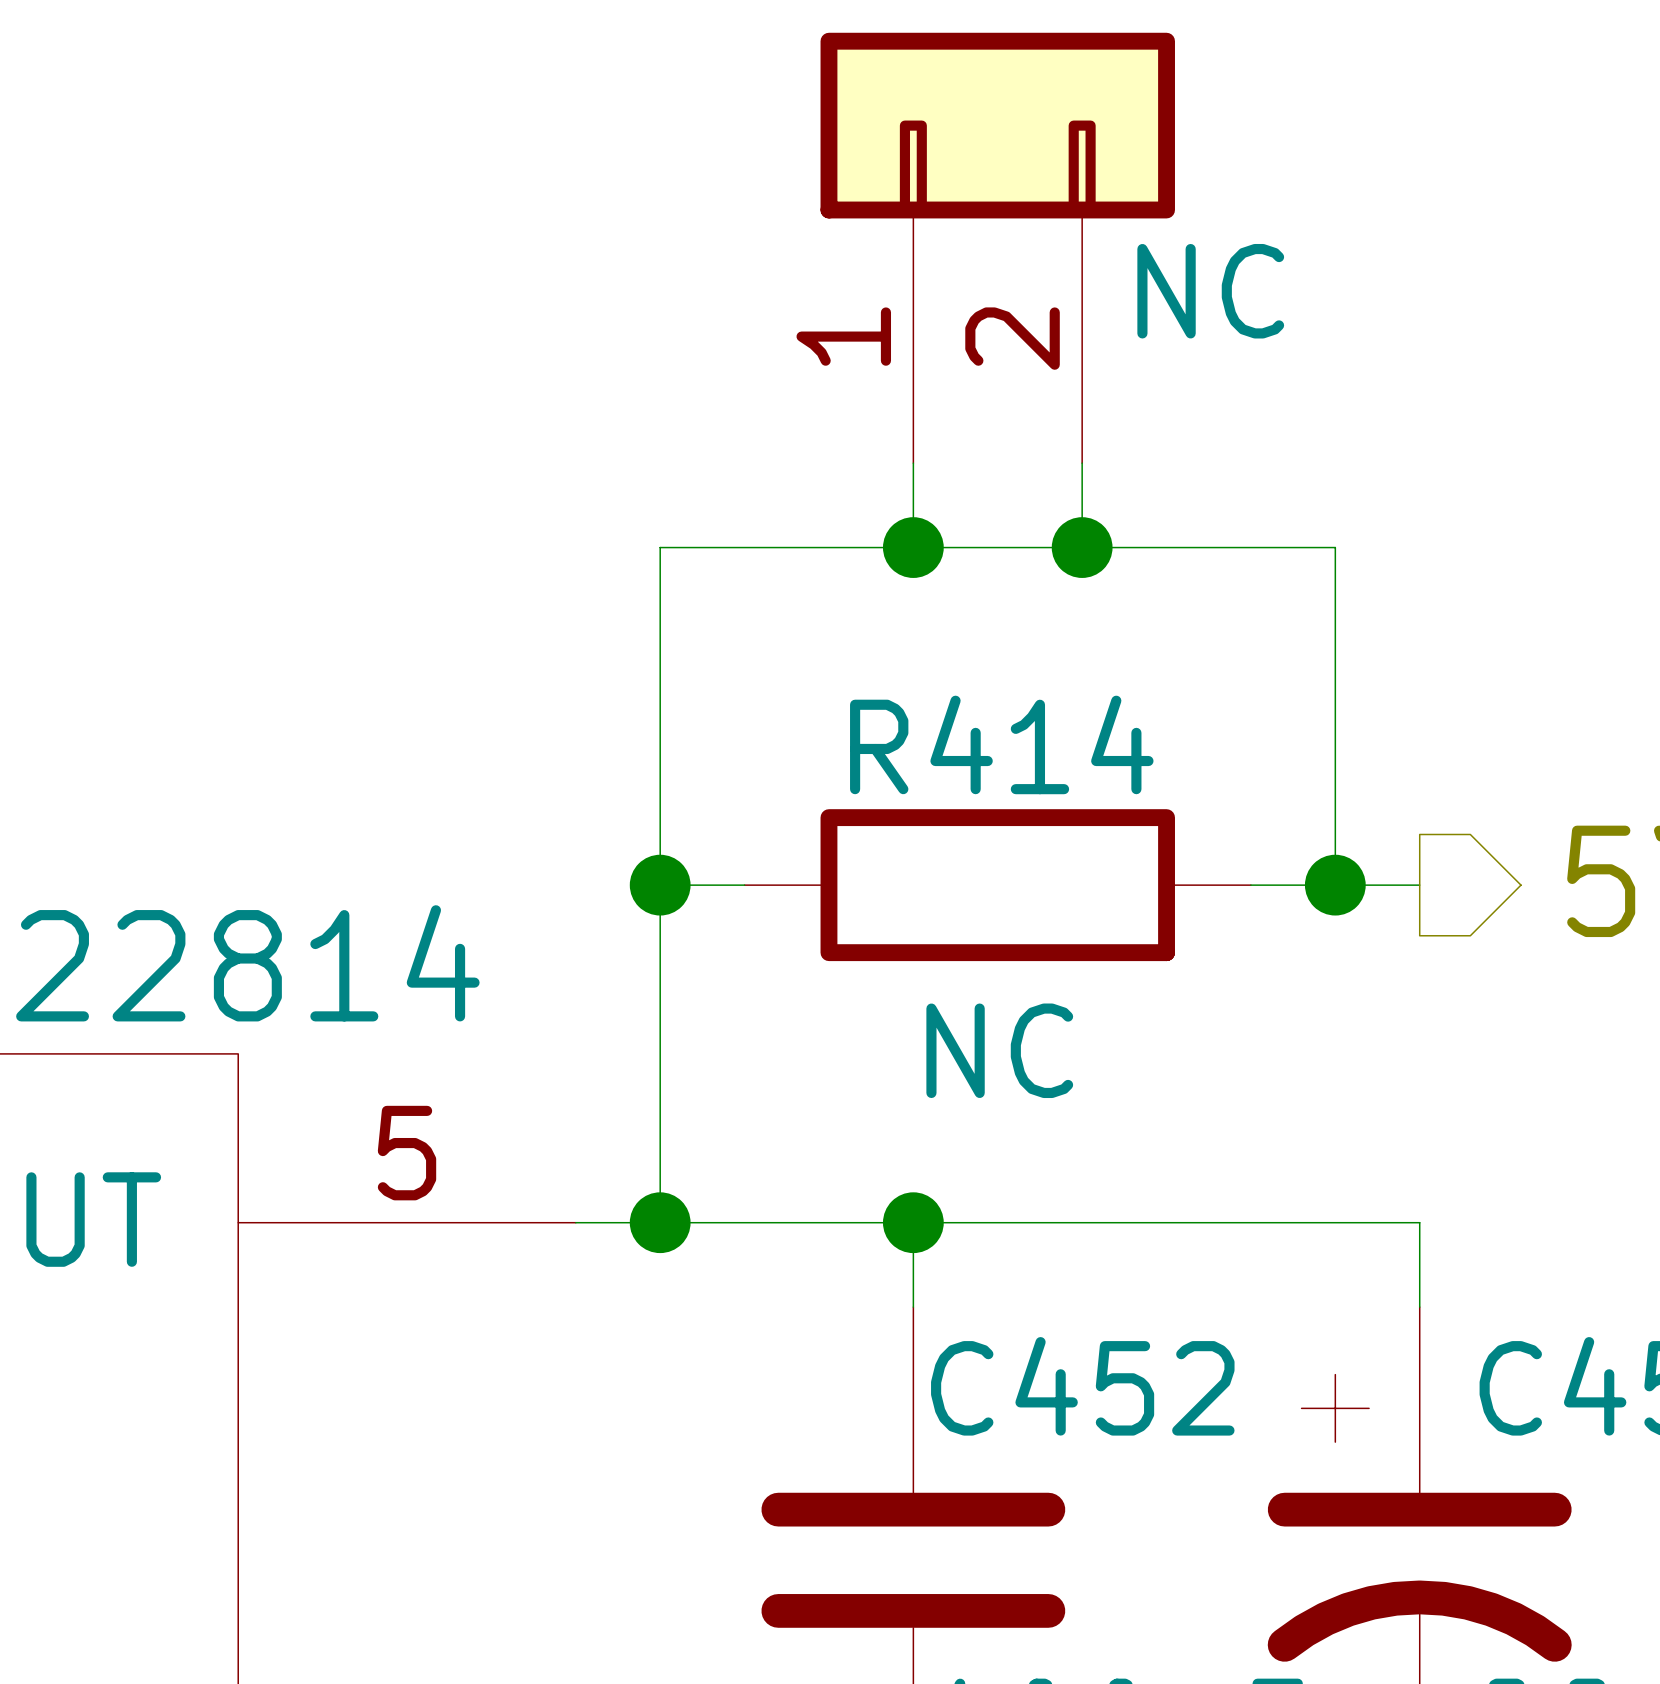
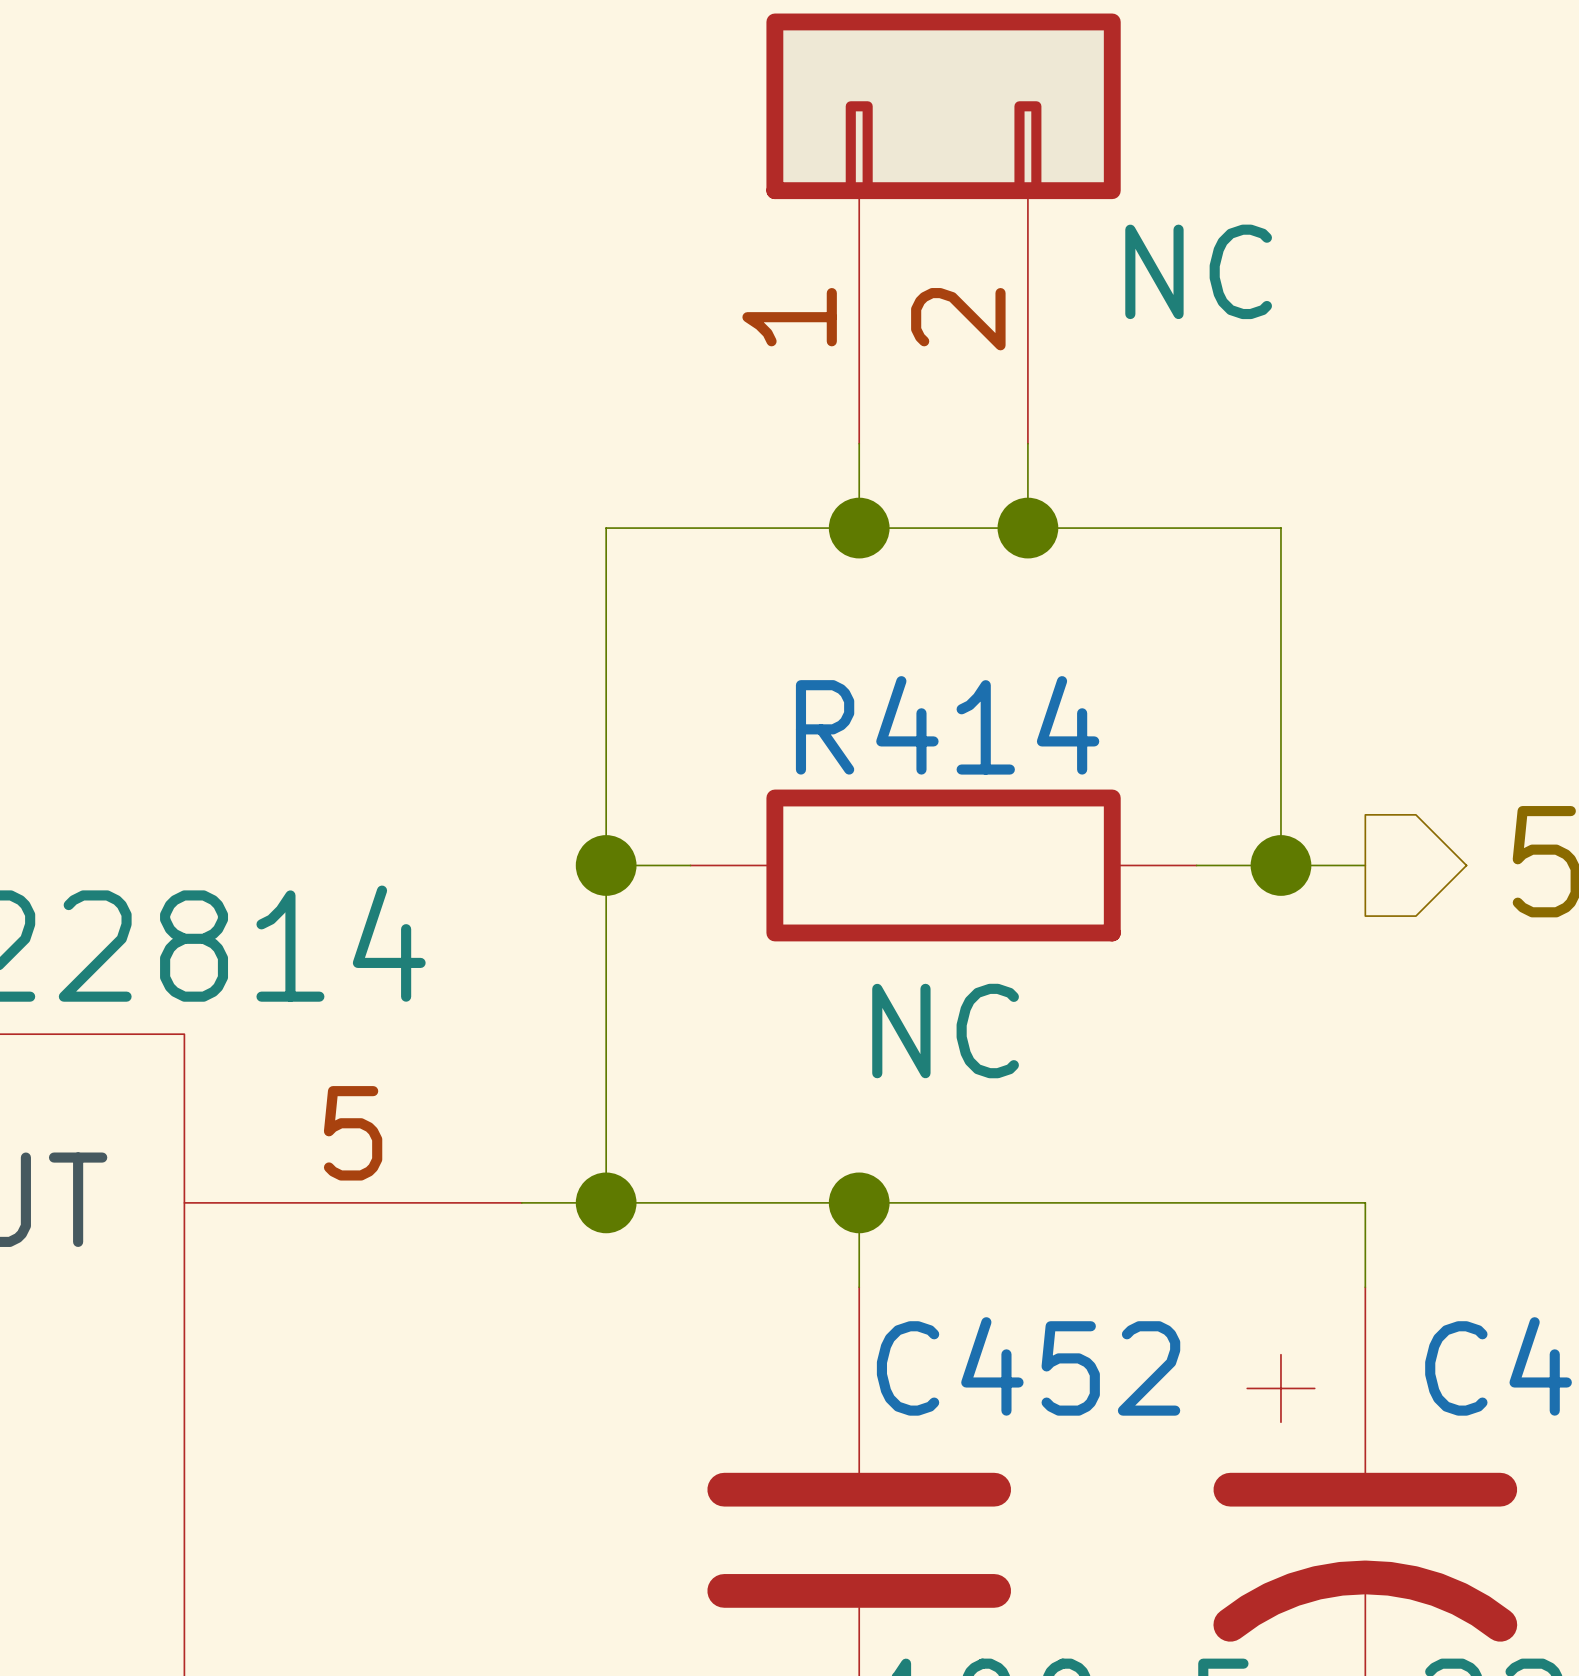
part value position: NC (1210, 291) -> NC (1198, 271)

